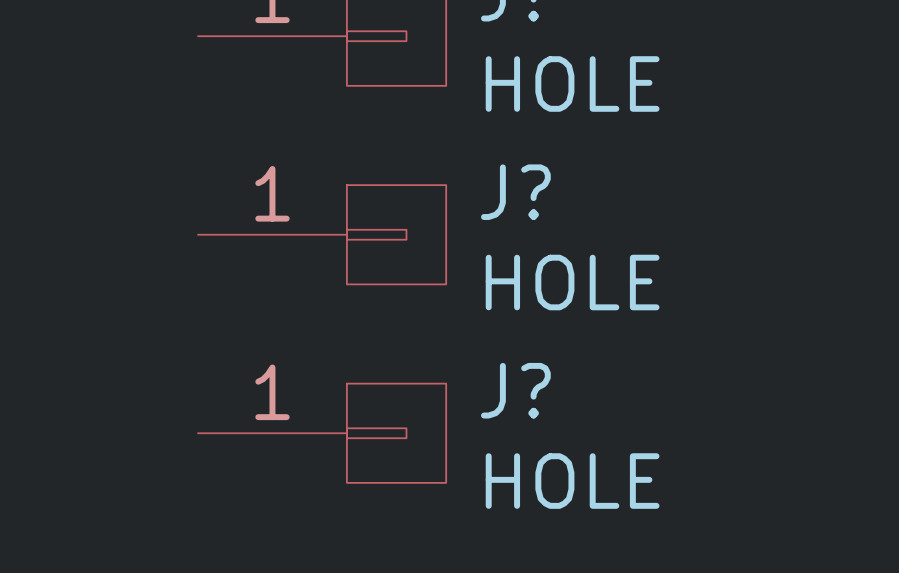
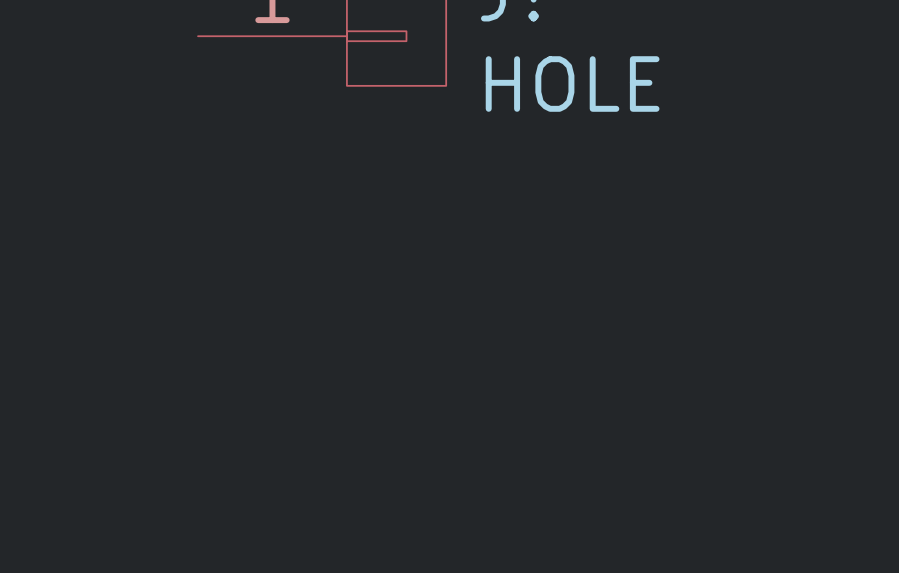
J?: HOLE (322, 234) -> none
J?: HOLE (322, 433) -> none

